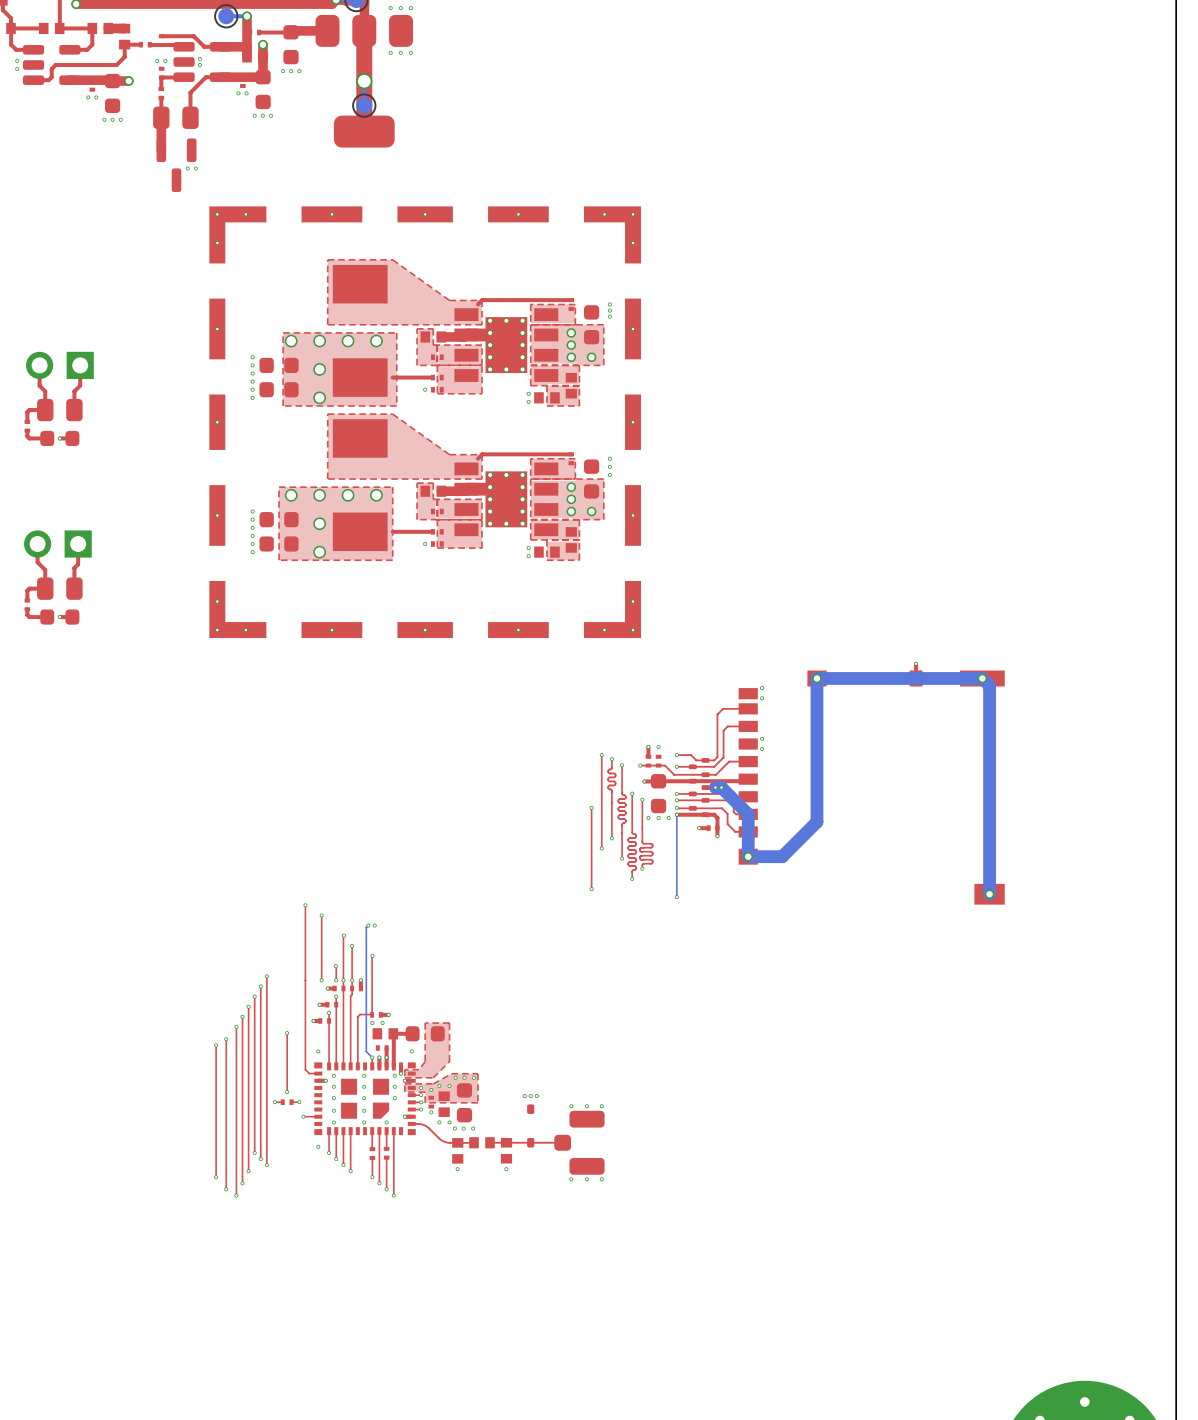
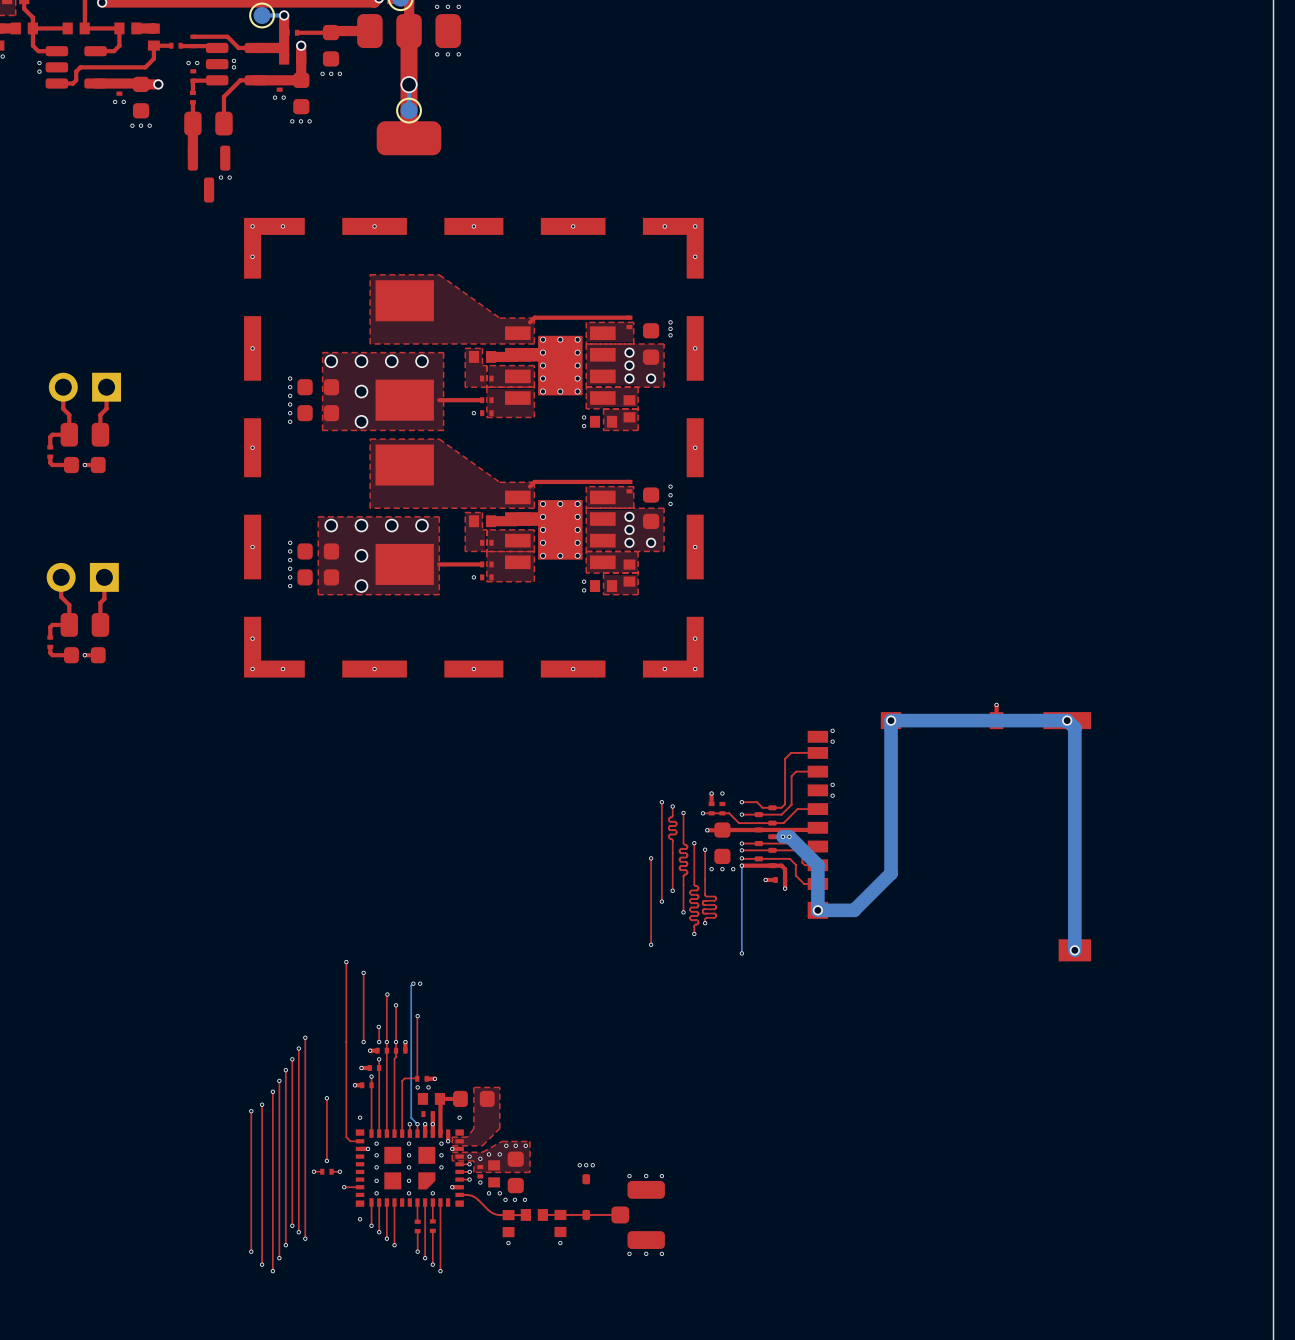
top track: none -> (409, 1124) (409, 1133)
via: none -> (409, 1124)

